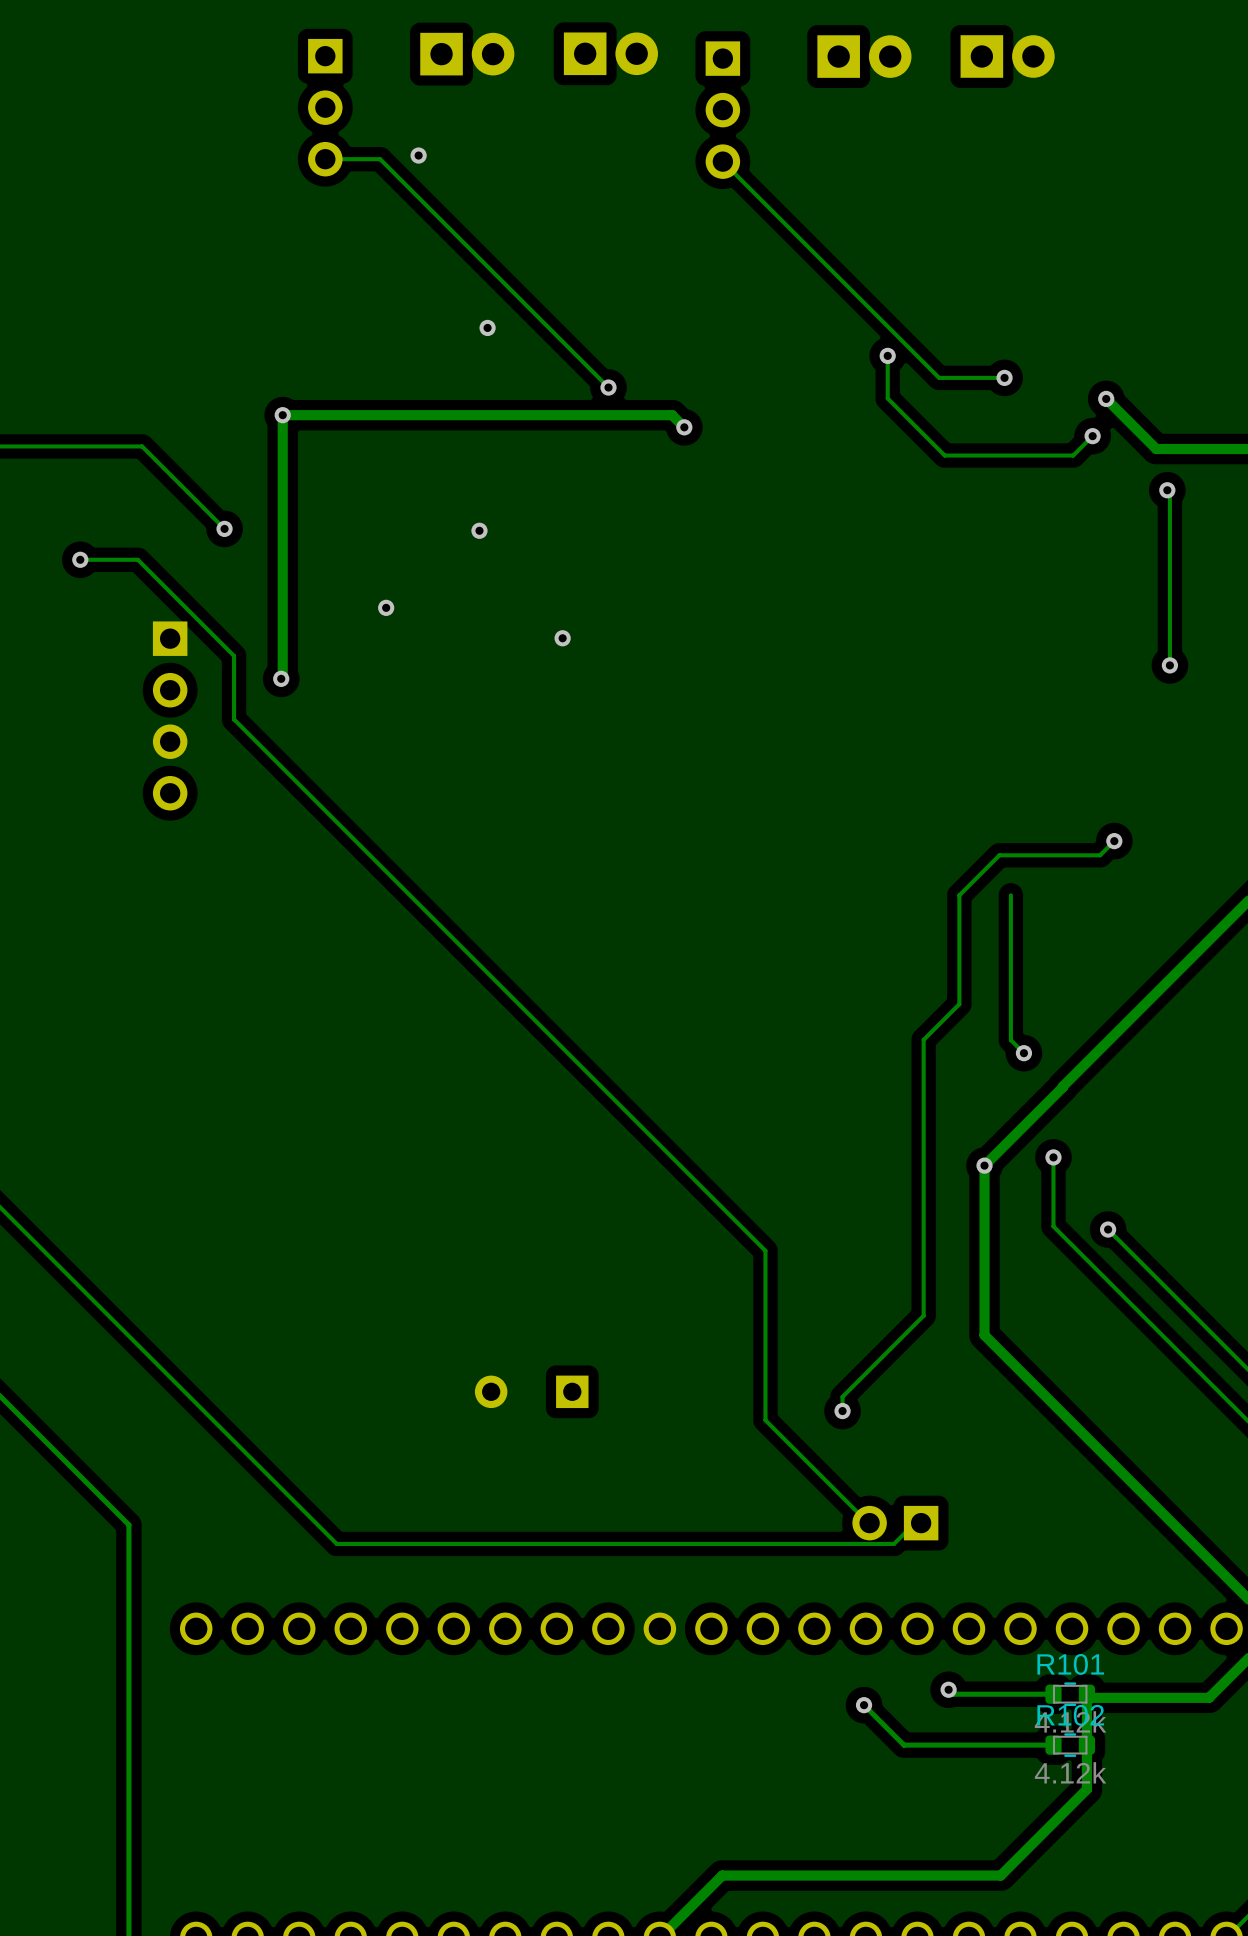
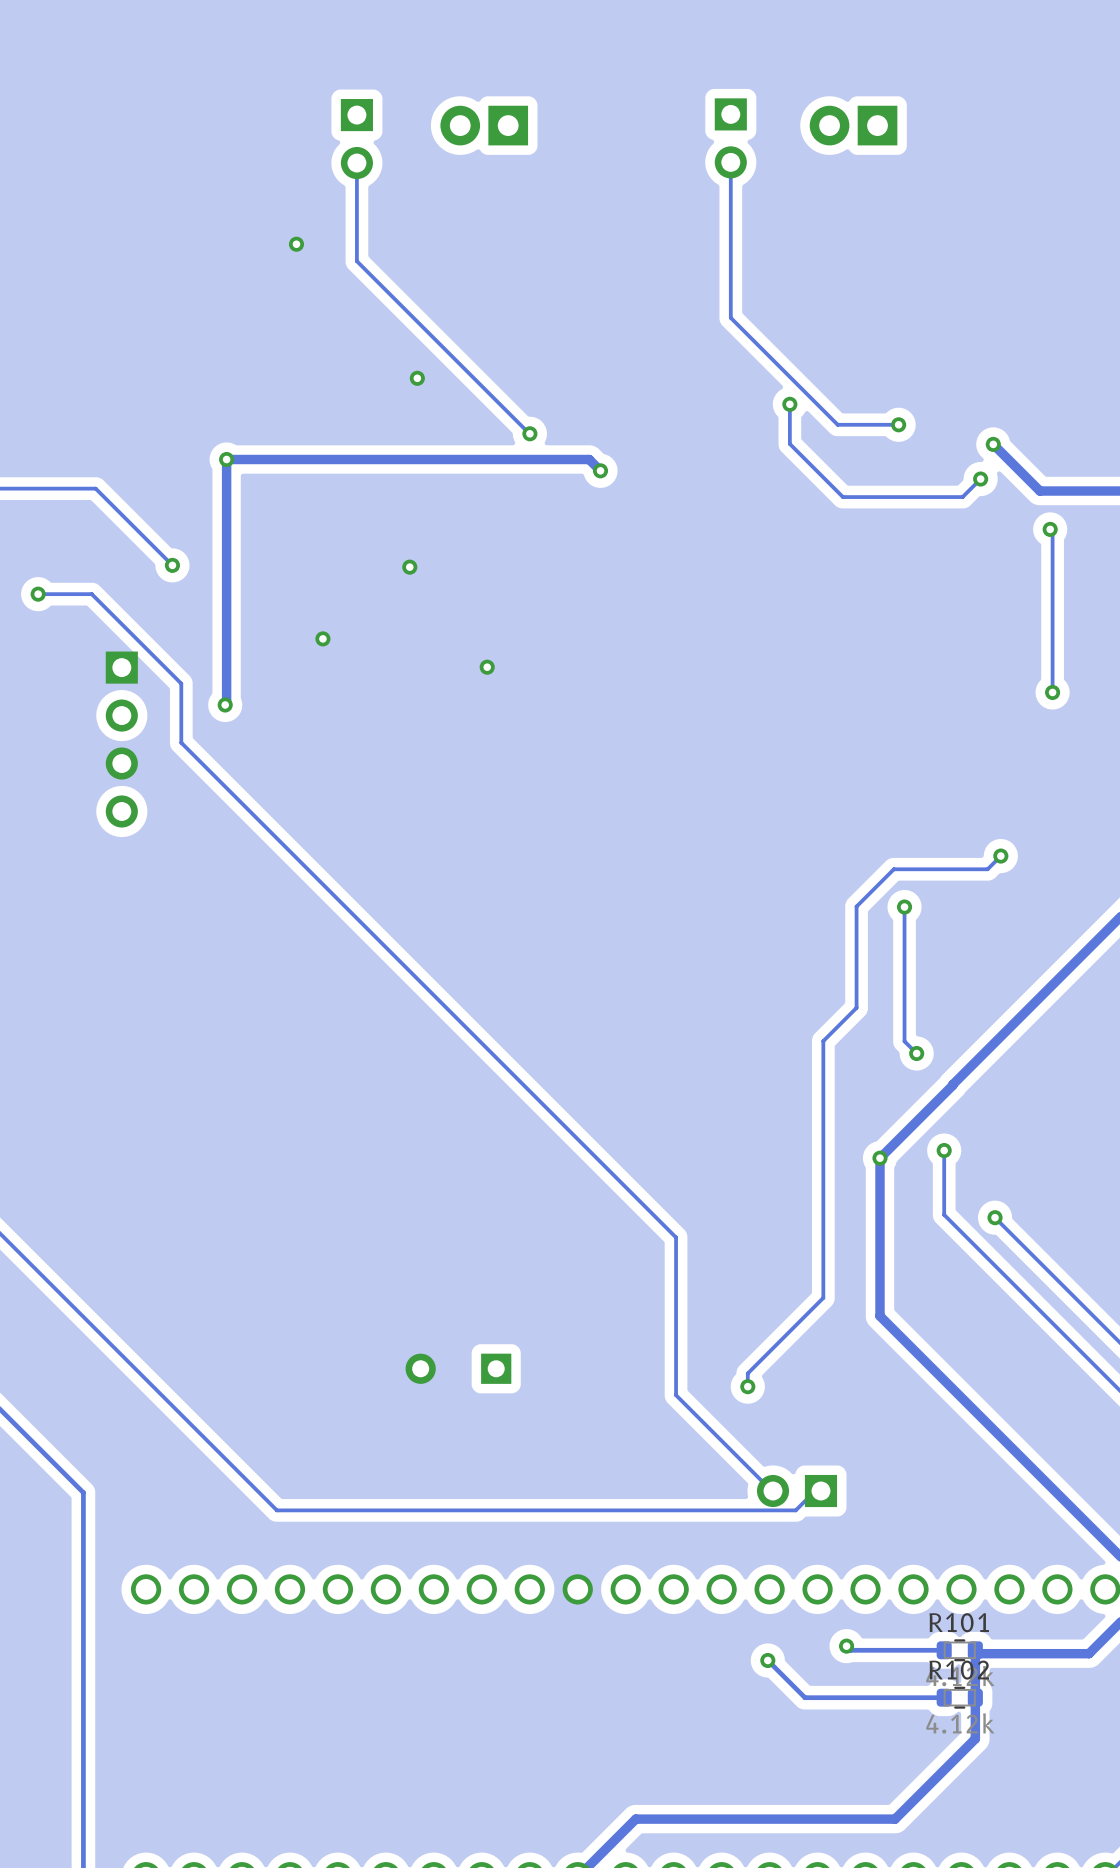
part: (610, 53) -> none
part: (467, 54) -> none
part: none -> (484, 125)
part: (864, 56) -> none
part: none -> (853, 125)
part: (1007, 56) -> none
part: none -> (356, 139)
part: none -> (730, 138)
part: (325, 107) -> none
part: (722, 110) -> none
via position: (418, 155) -> (296, 244)
track: (325, 159) (380, 159) (608, 387) -> (356, 163) (356, 261) (529, 433)
track: (722, 161) (824, 263) -> (730, 162) (730, 317)
via: none -> (904, 907)

